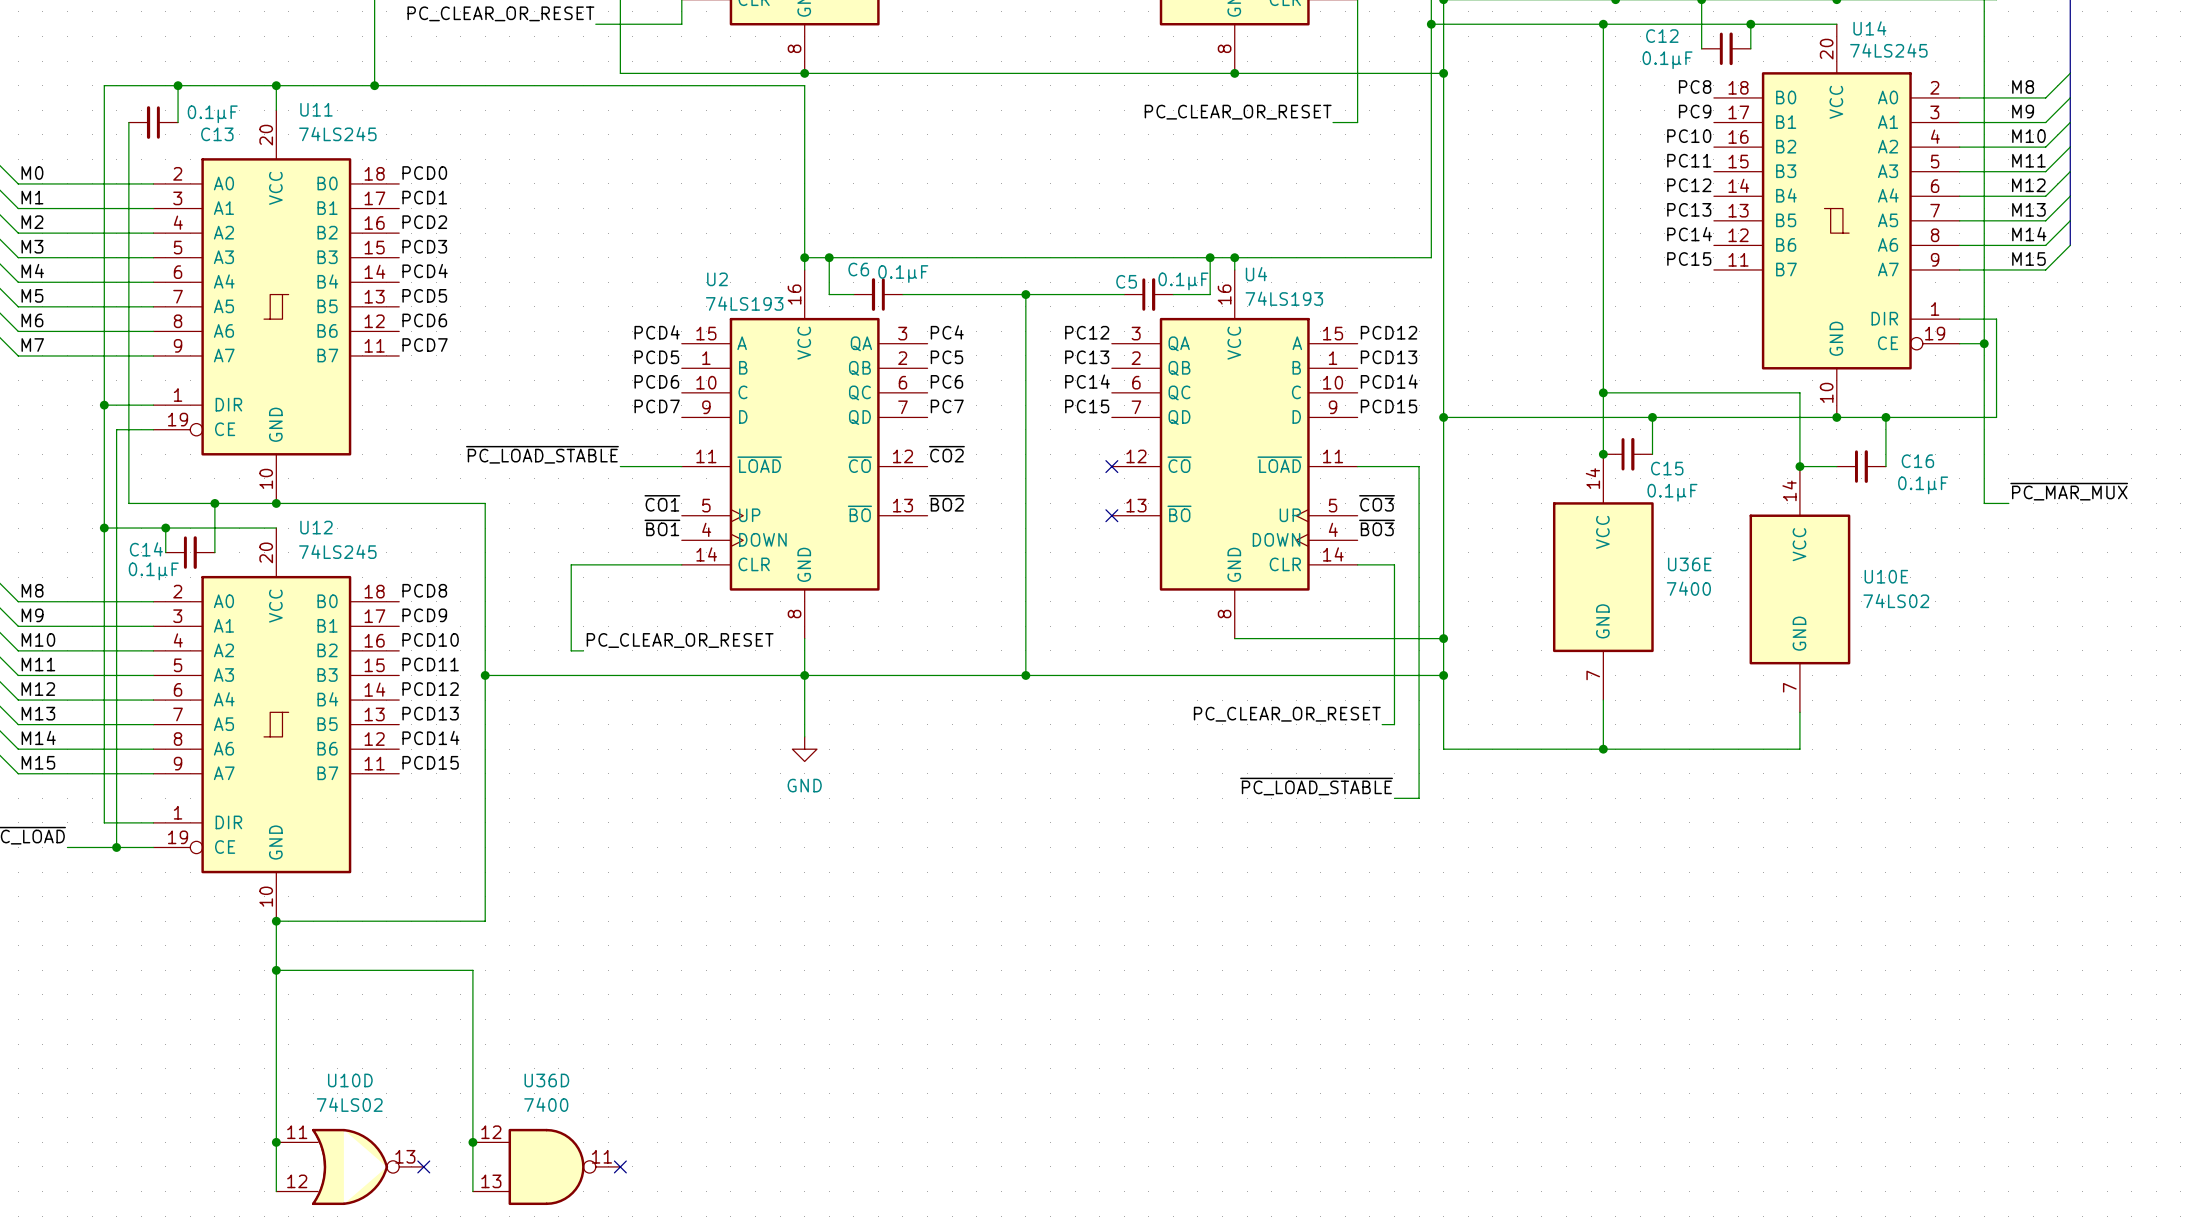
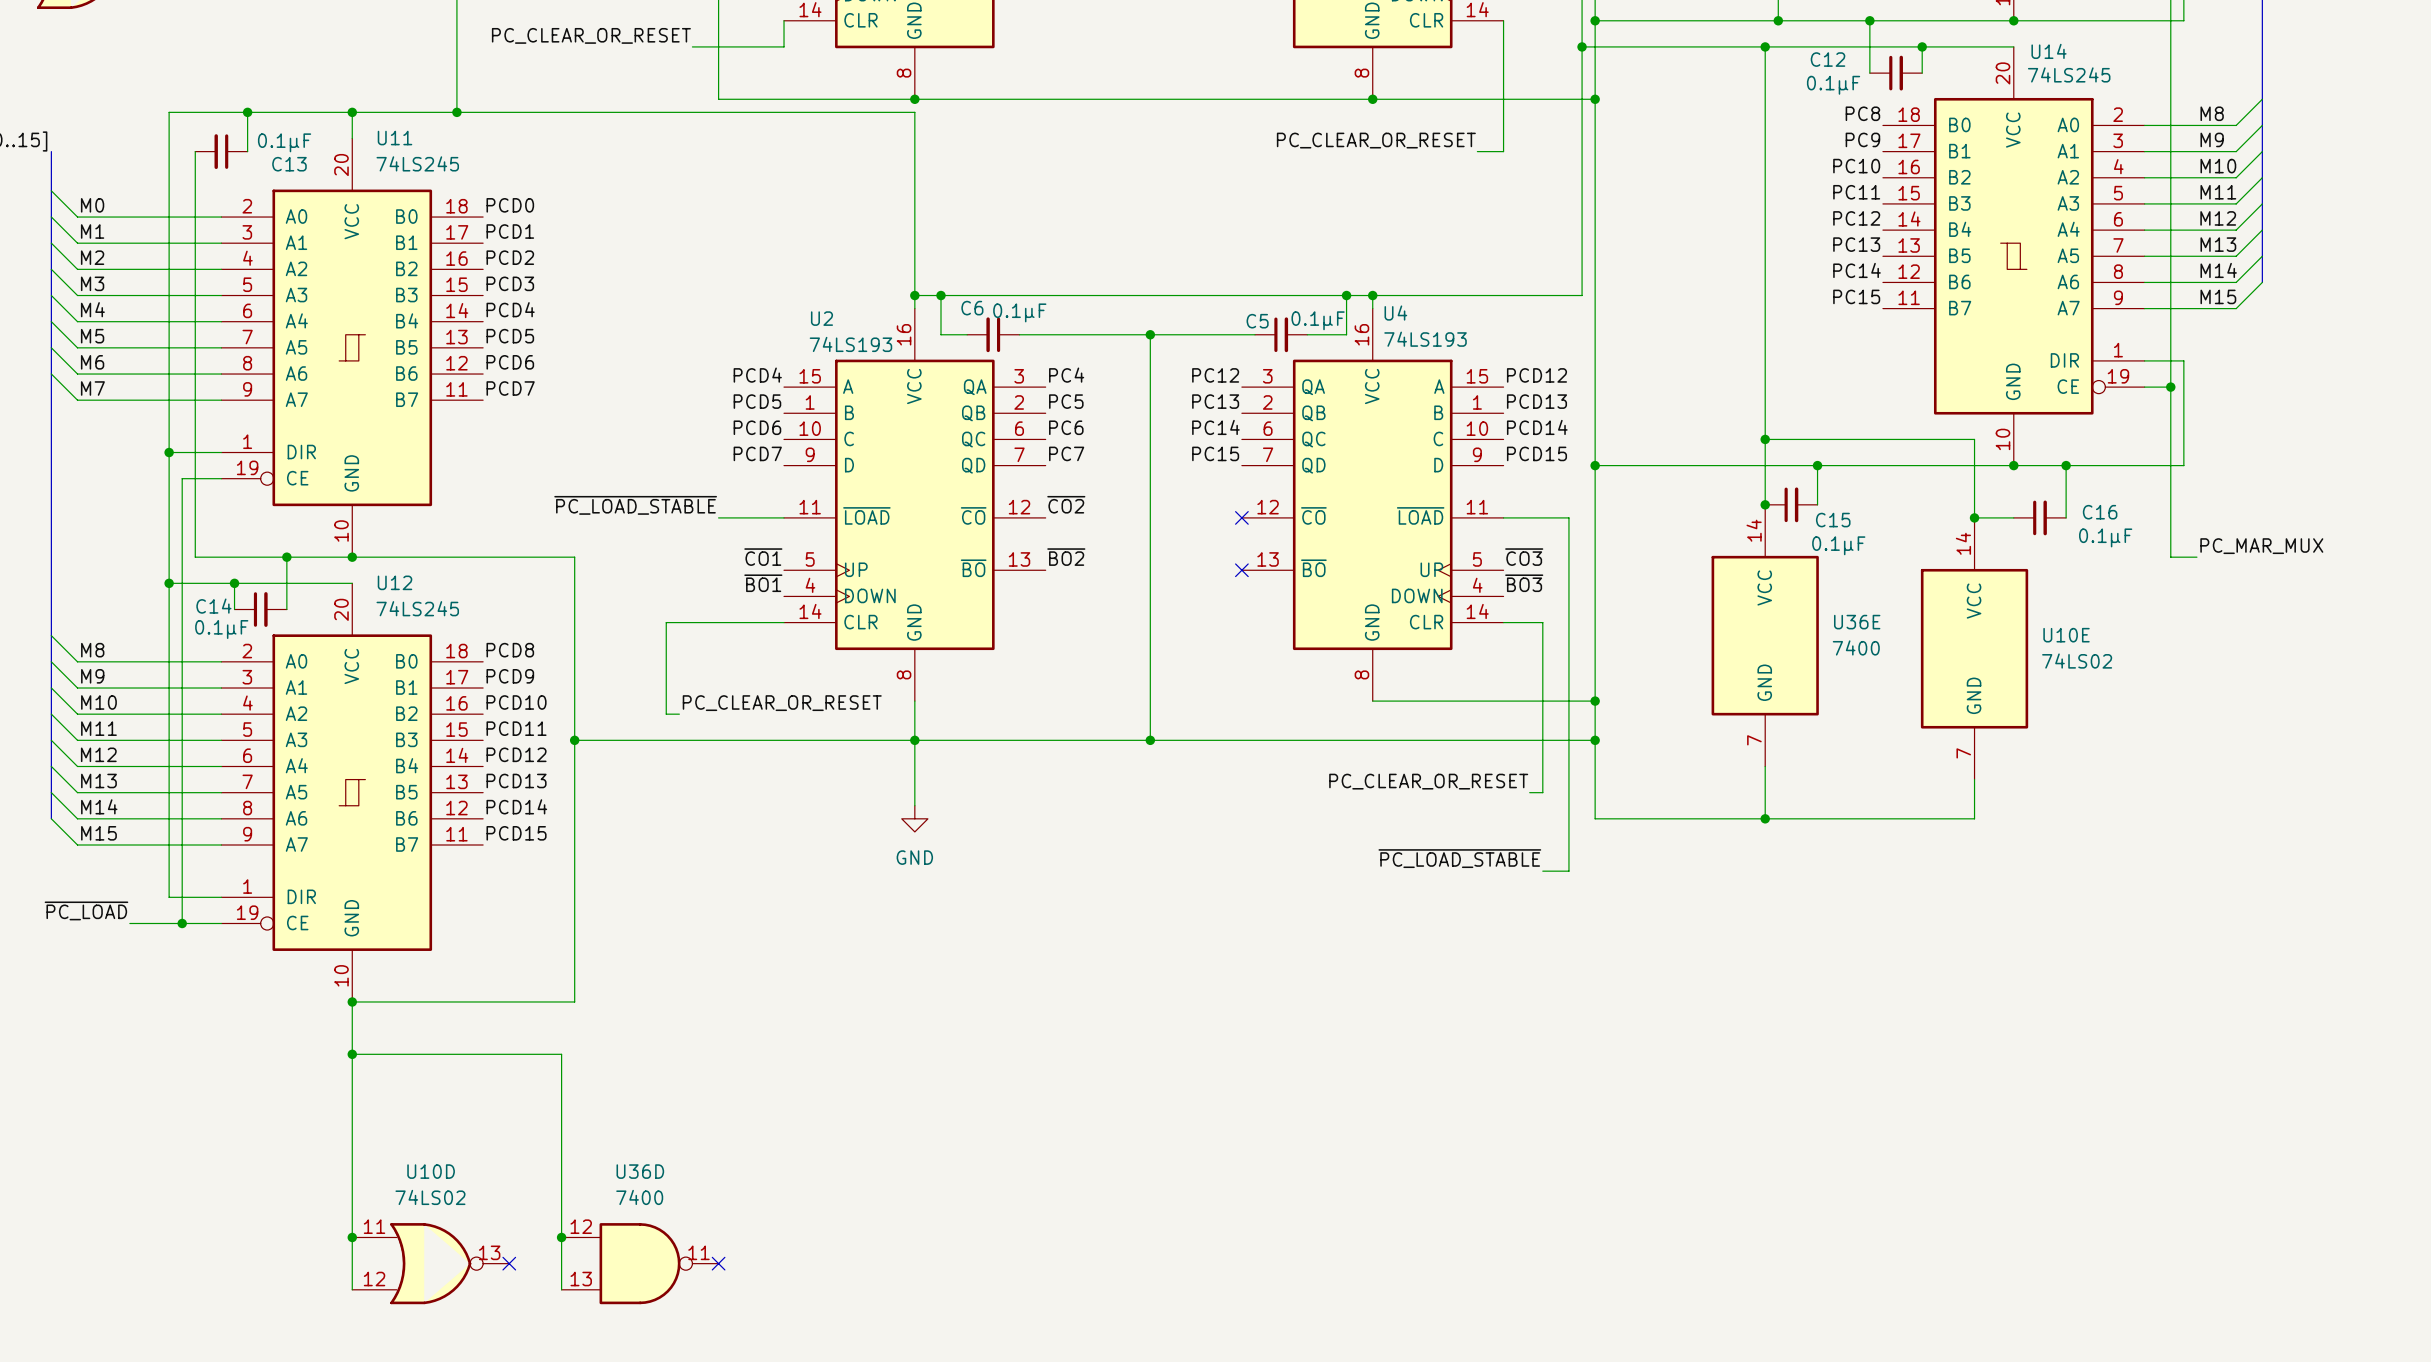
label: ~{PC_MAR_MUX} (2069, 491) -> PC_MAR_MUX (2261, 546)

